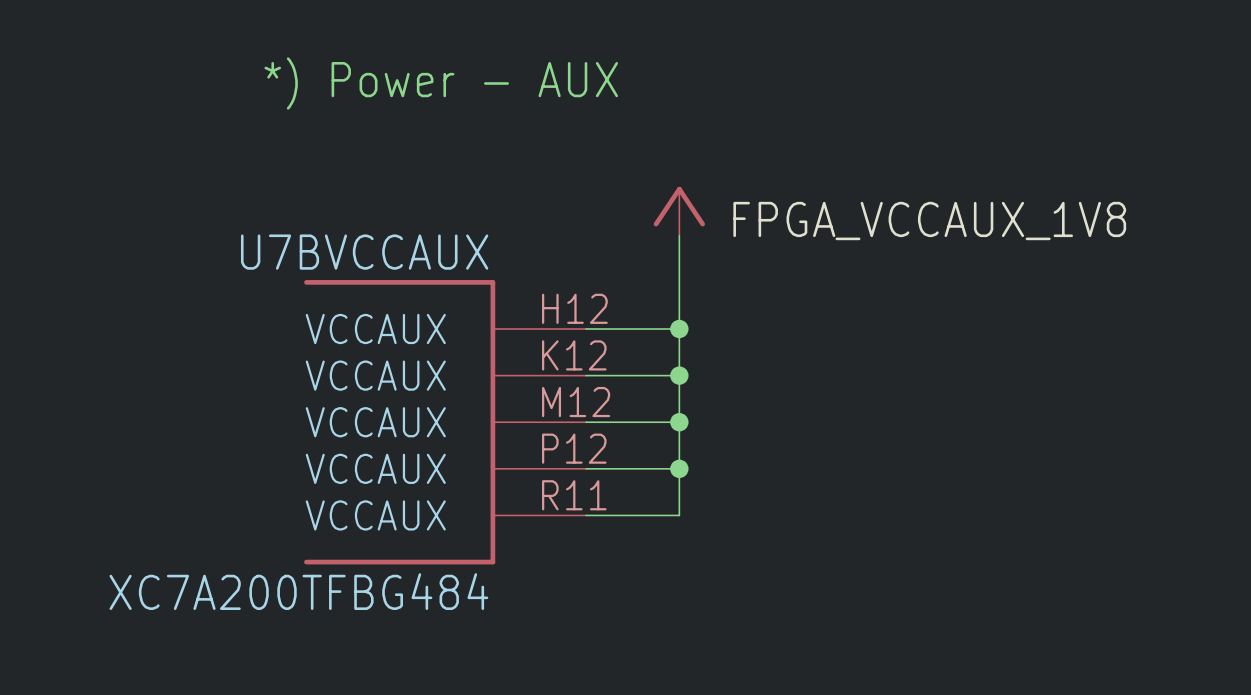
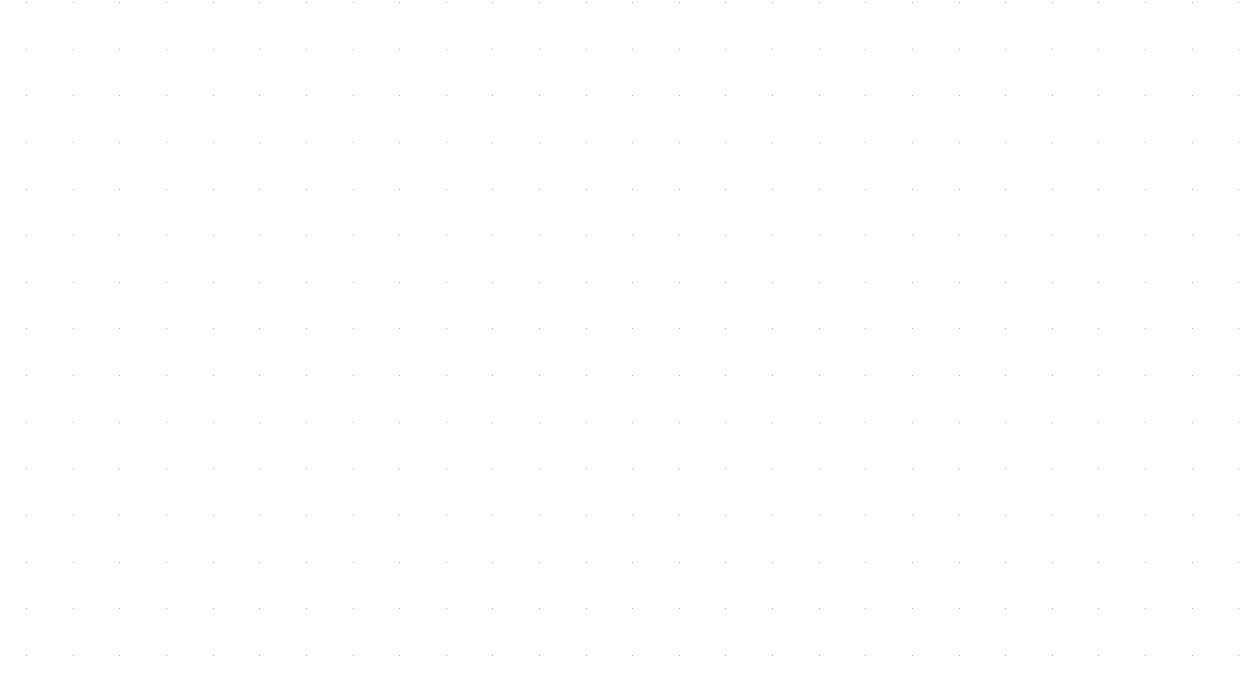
text: *) Power - AUX (441, 83) -> none
power symbol: (679, 211) -> none
label: FPGA_VCCAUX_1V8 (929, 221) -> none
wire: (679, 235) (679, 515) (586, 515) -> none
wire: (586, 328) (679, 328) -> none
junction: (679, 328) -> none
wire: (586, 375) (679, 375) -> none
junction: (679, 375) -> none
U7BVCCAUX: XC7A200TFBG484 (445, 422) -> none
wire: (586, 422) (679, 422) -> none
junction: (679, 422) -> none
wire: (586, 468) (679, 468) -> none
junction: (679, 468) -> none

